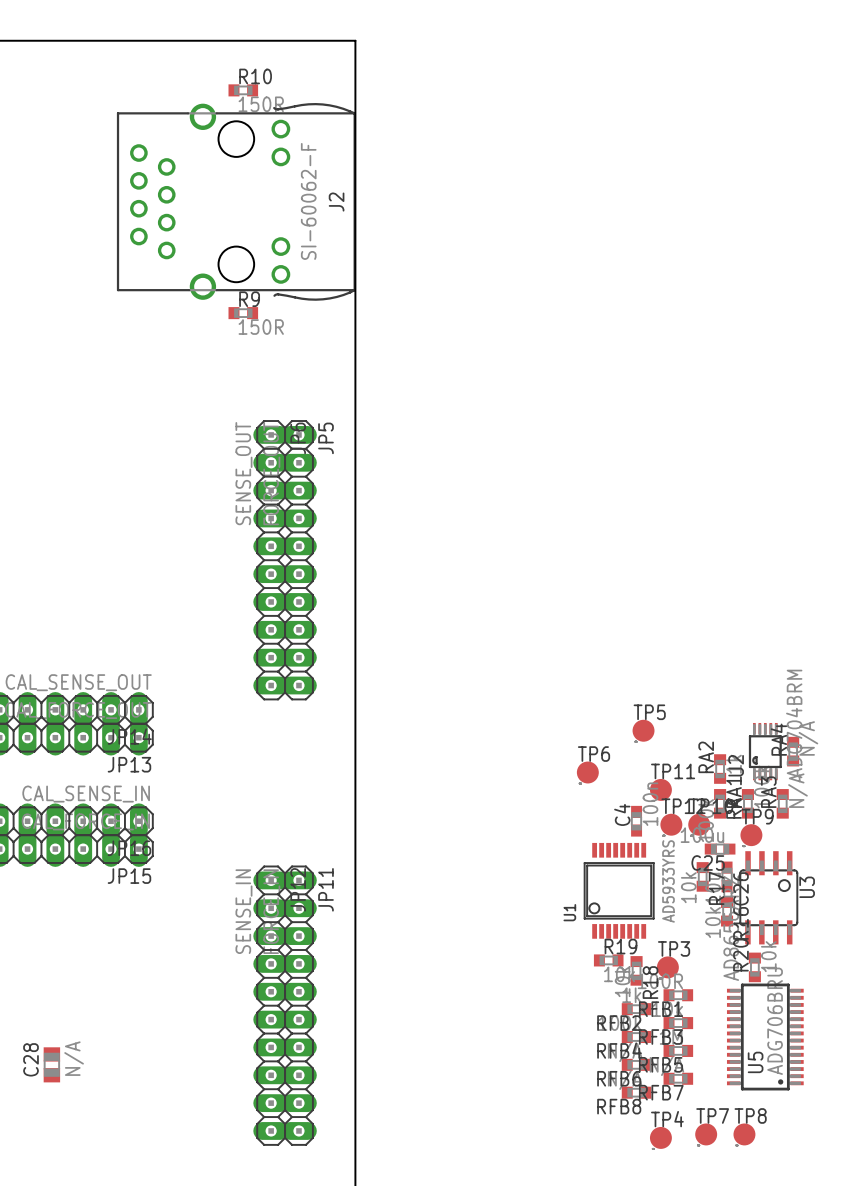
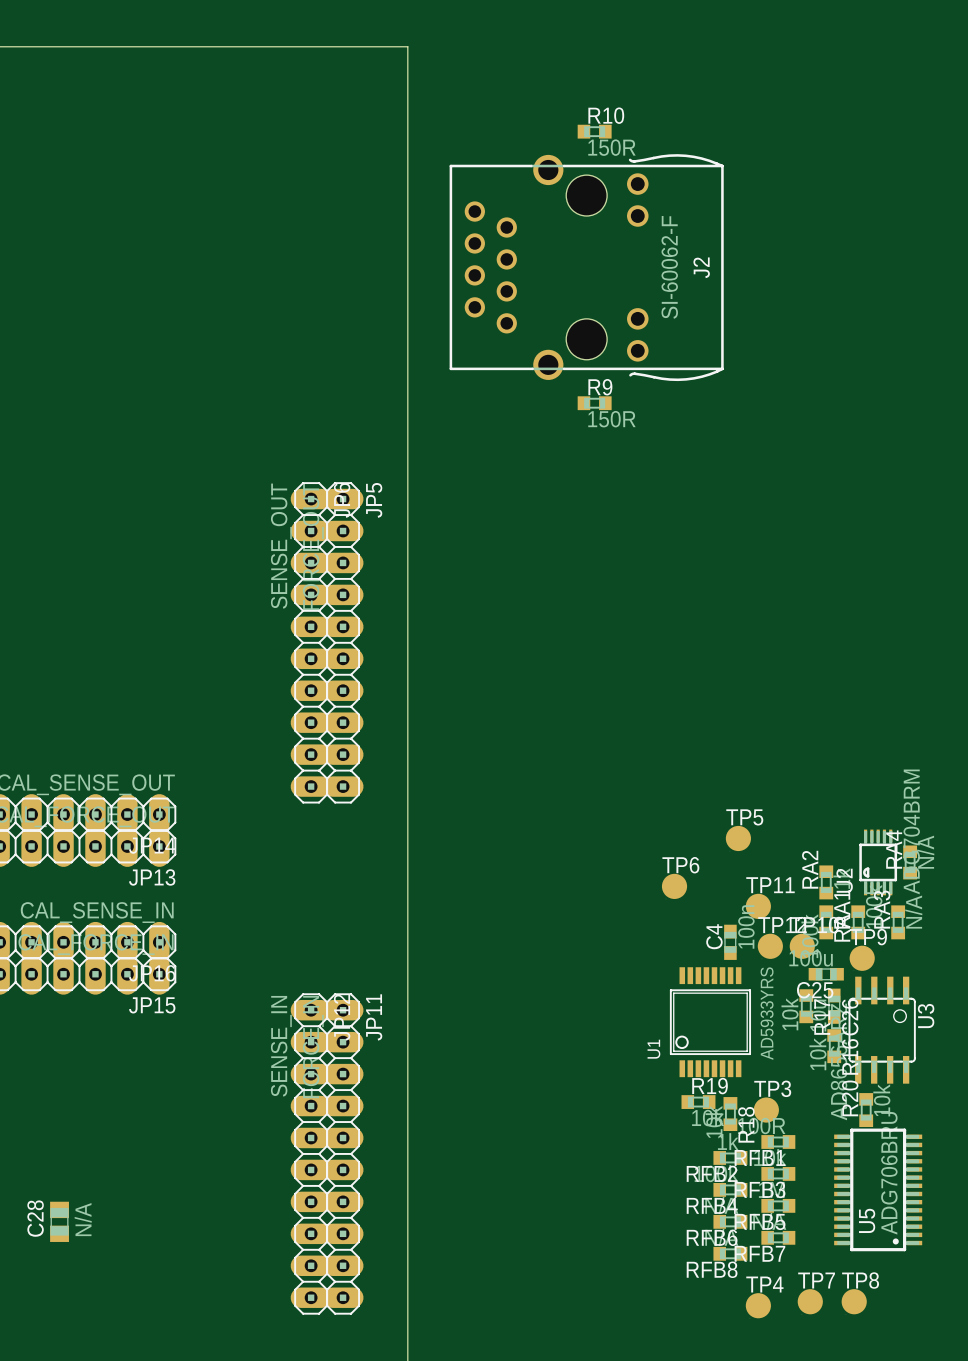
R10 position: (243, 90) -> (594, 131)
J2 position: (236, 201) -> (586, 267)
R9 position: (243, 313) -> (594, 403)

